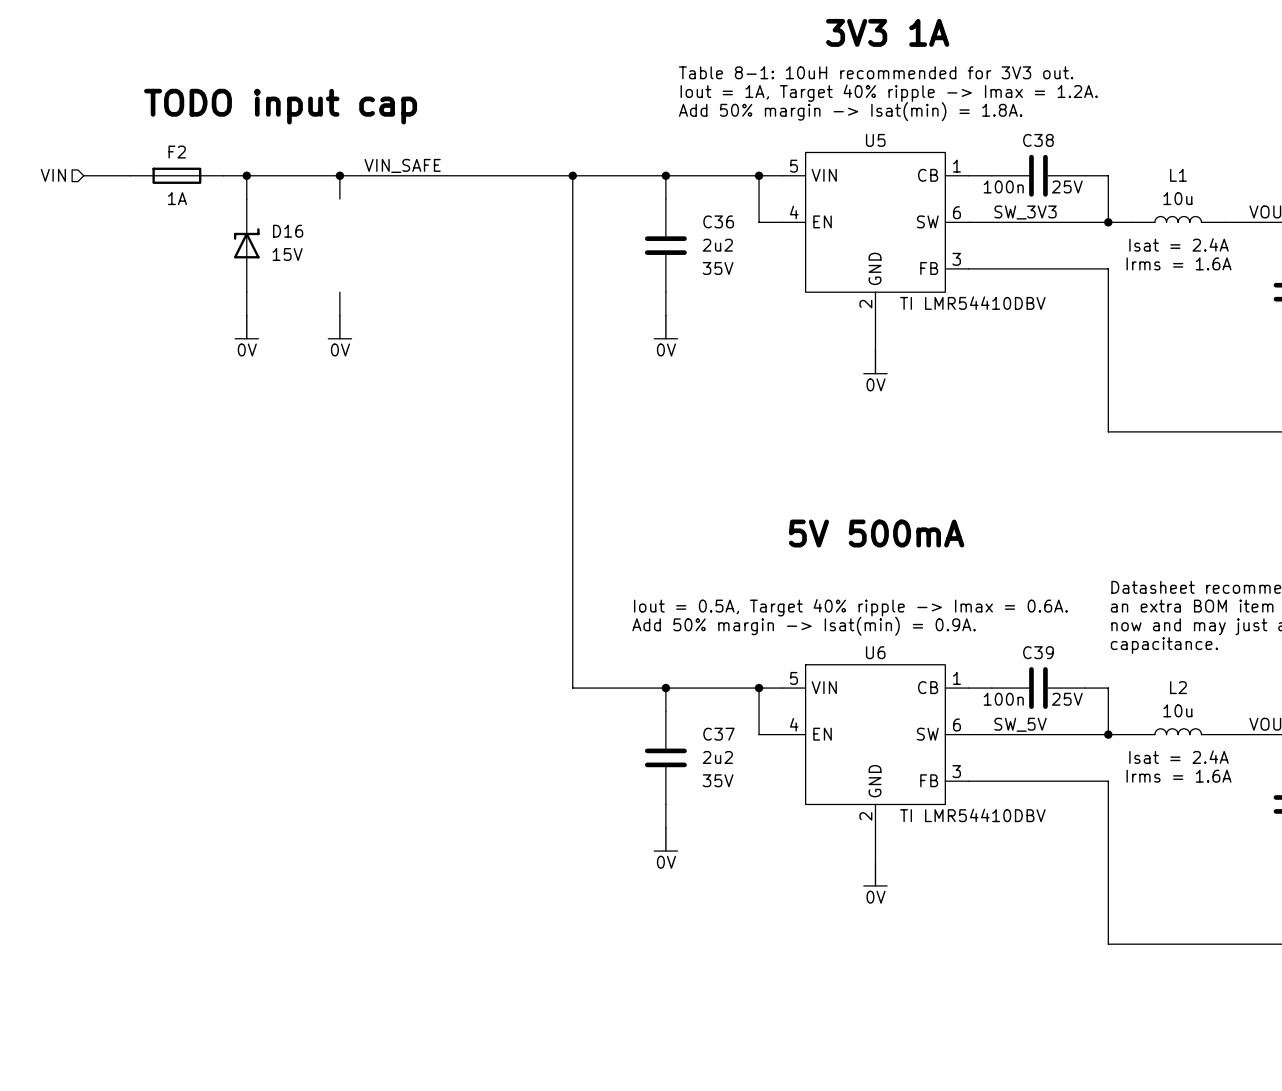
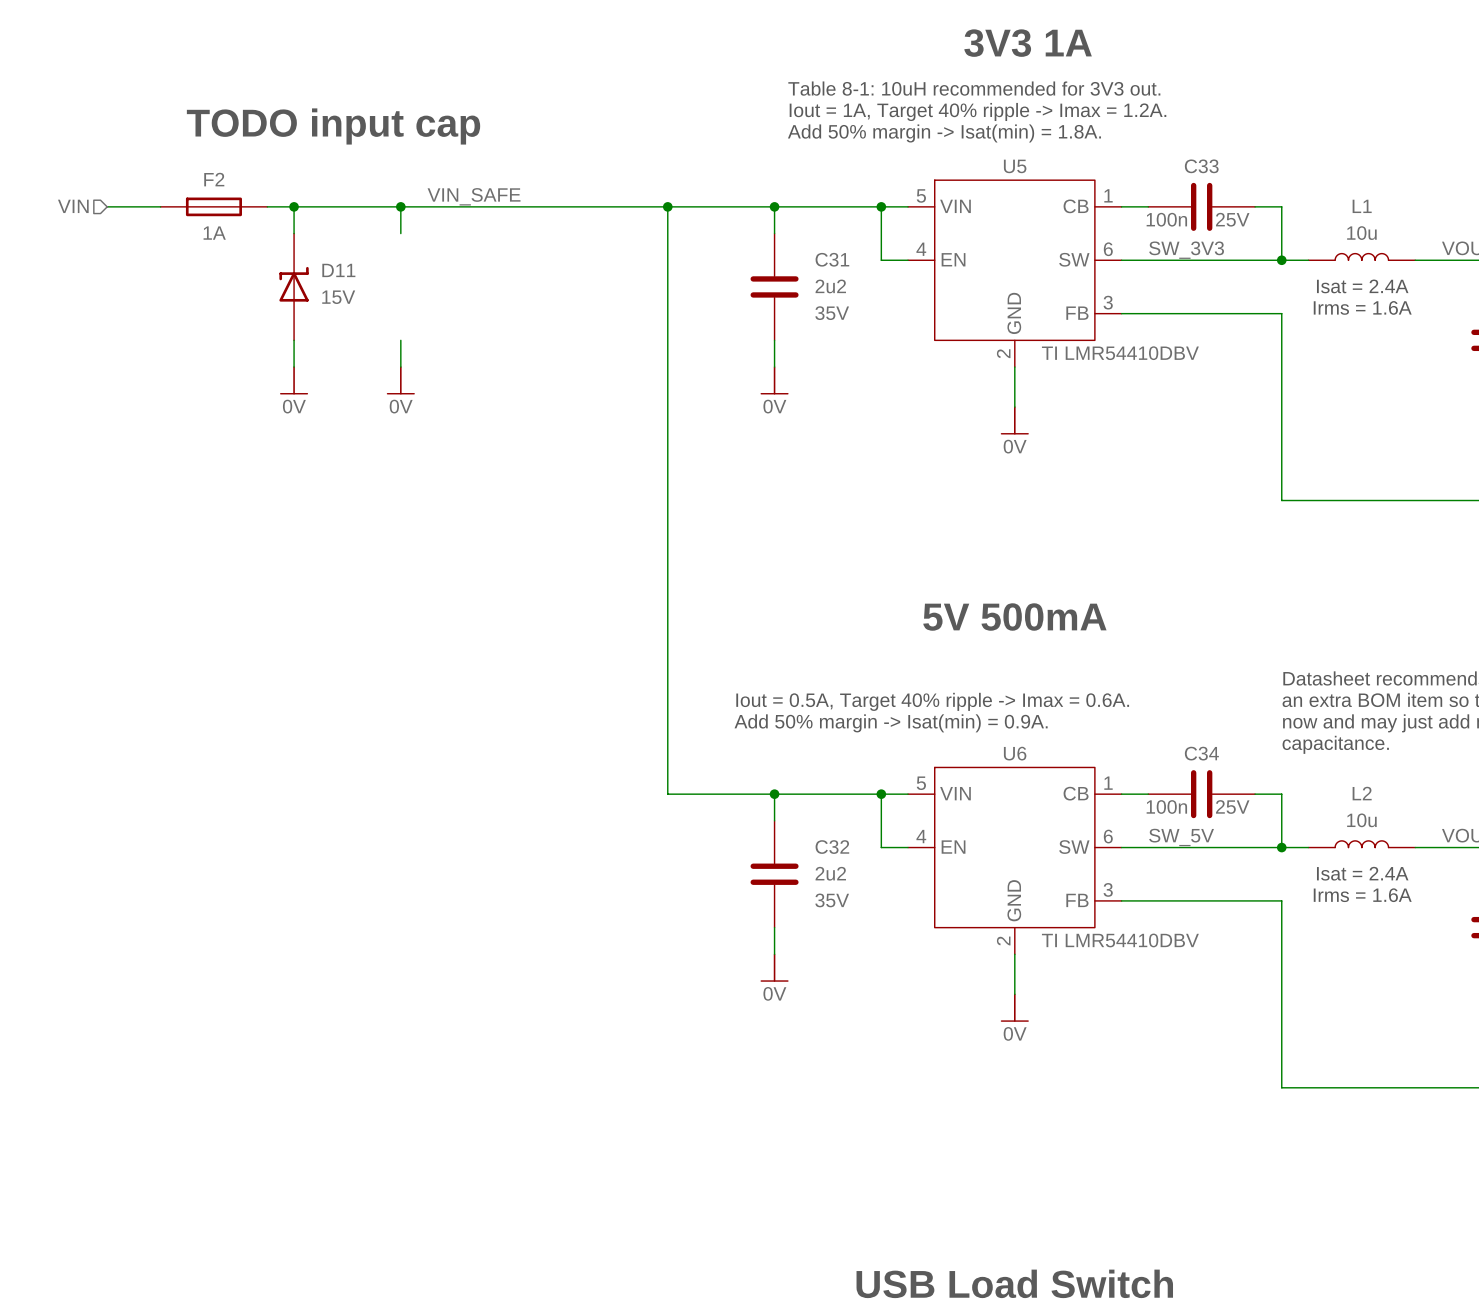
C38 name: C38 (1038, 140) -> C33 (1201, 166)
C36 name: C36 (718, 221) -> C31 (832, 259)
D16 name: D16 (288, 231) -> D11 (338, 270)
C39 name: C39 (1038, 652) -> C34 (1201, 753)
C37 name: C37 (718, 734) -> C32 (832, 847)

